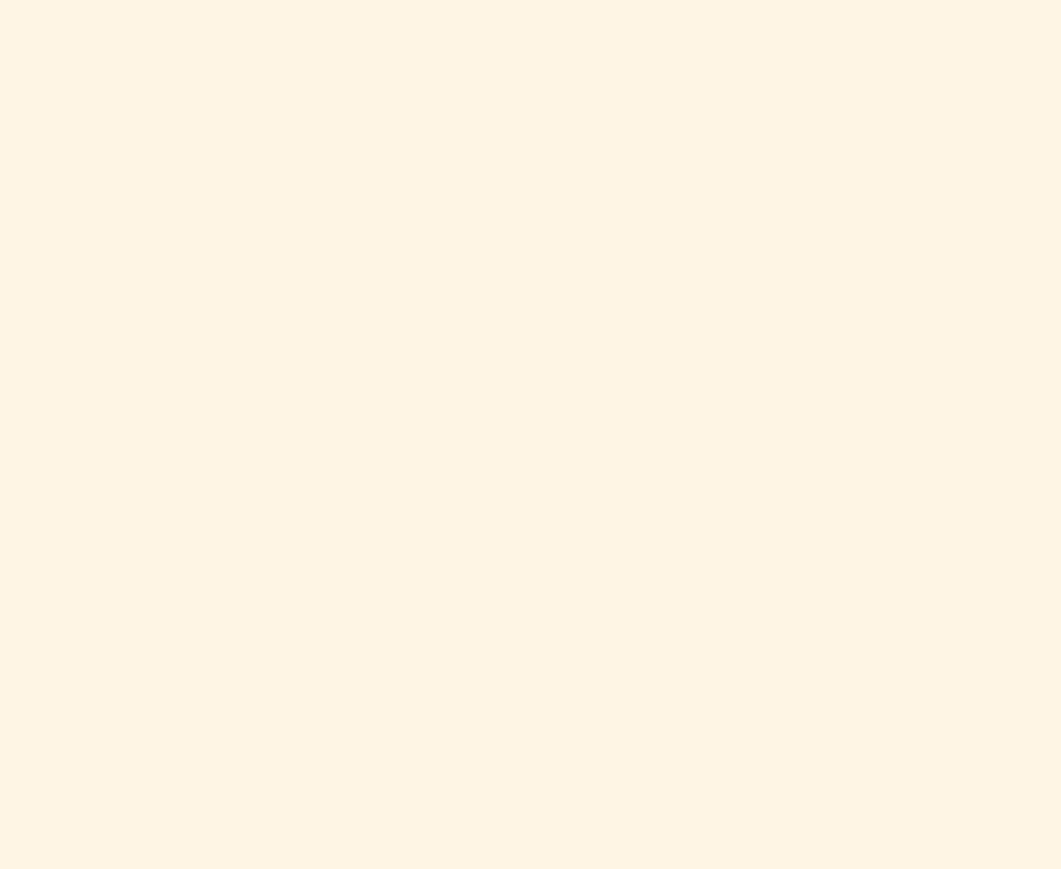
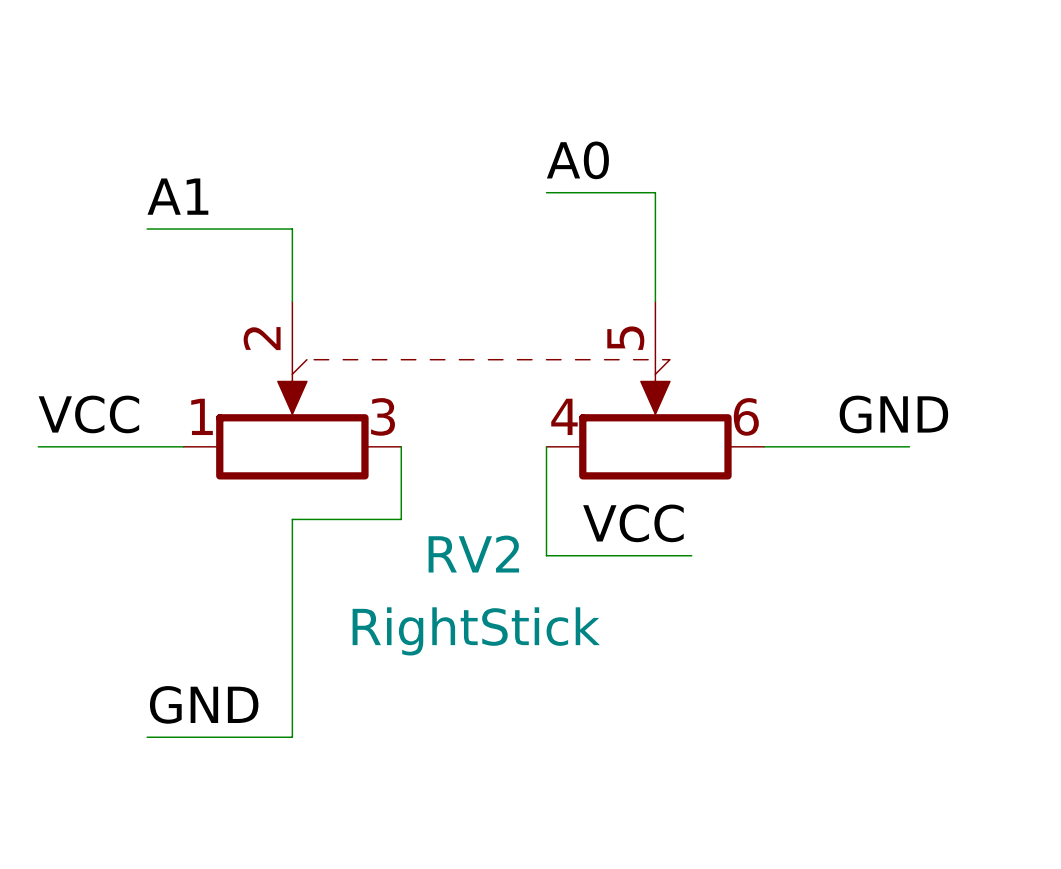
label: none -> A0 (577, 160)
wire: none -> (546, 192) (655, 192) (655, 301)
label: none -> A1 (177, 196)
wire: none -> (147, 229) (292, 229) (292, 301)
RV2: none -> RightStick (473, 390)
label: none -> VCC (88, 414)
label: none -> GND (893, 414)
wire: none -> (38, 446) (183, 446)
wire: none -> (401, 446) (401, 519) (292, 519) (292, 737) (147, 737)
wire: none -> (546, 446) (546, 555) (691, 555)
wire: none -> (764, 446) (909, 446)
label: none -> VCC (633, 523)
label: none -> GND (204, 704)

